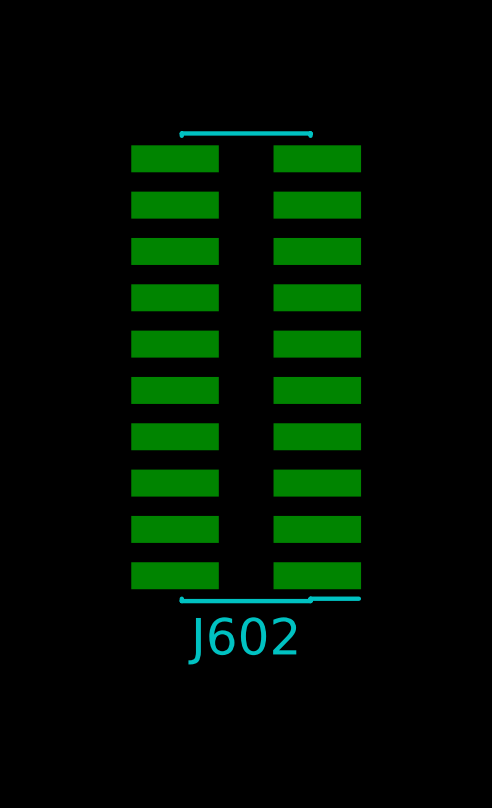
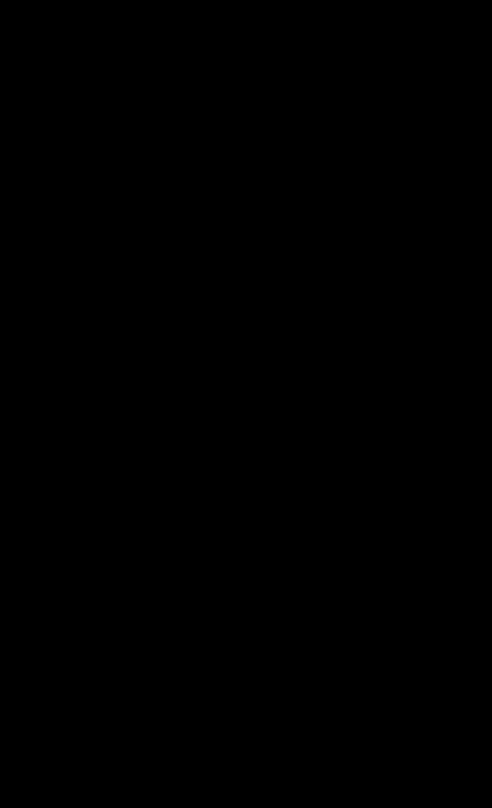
J602: (246, 367) -> none

